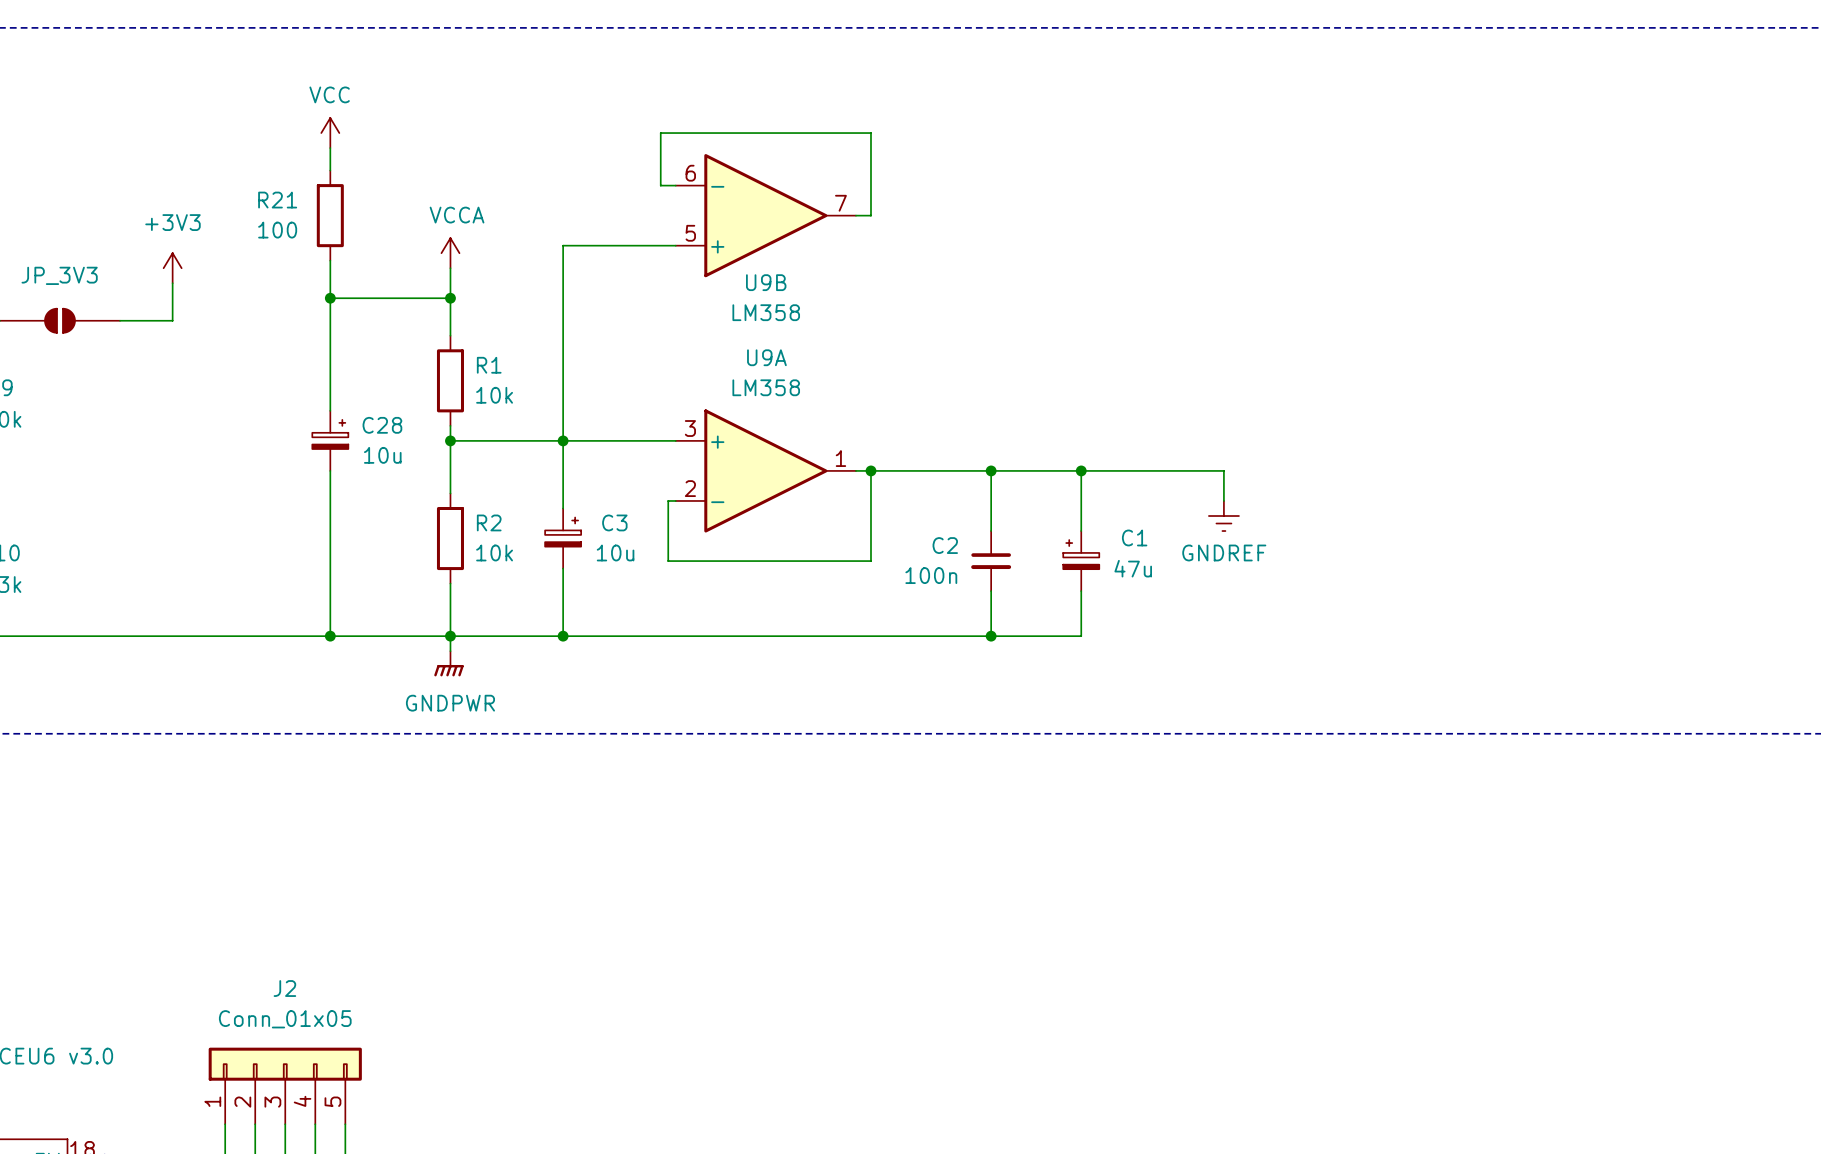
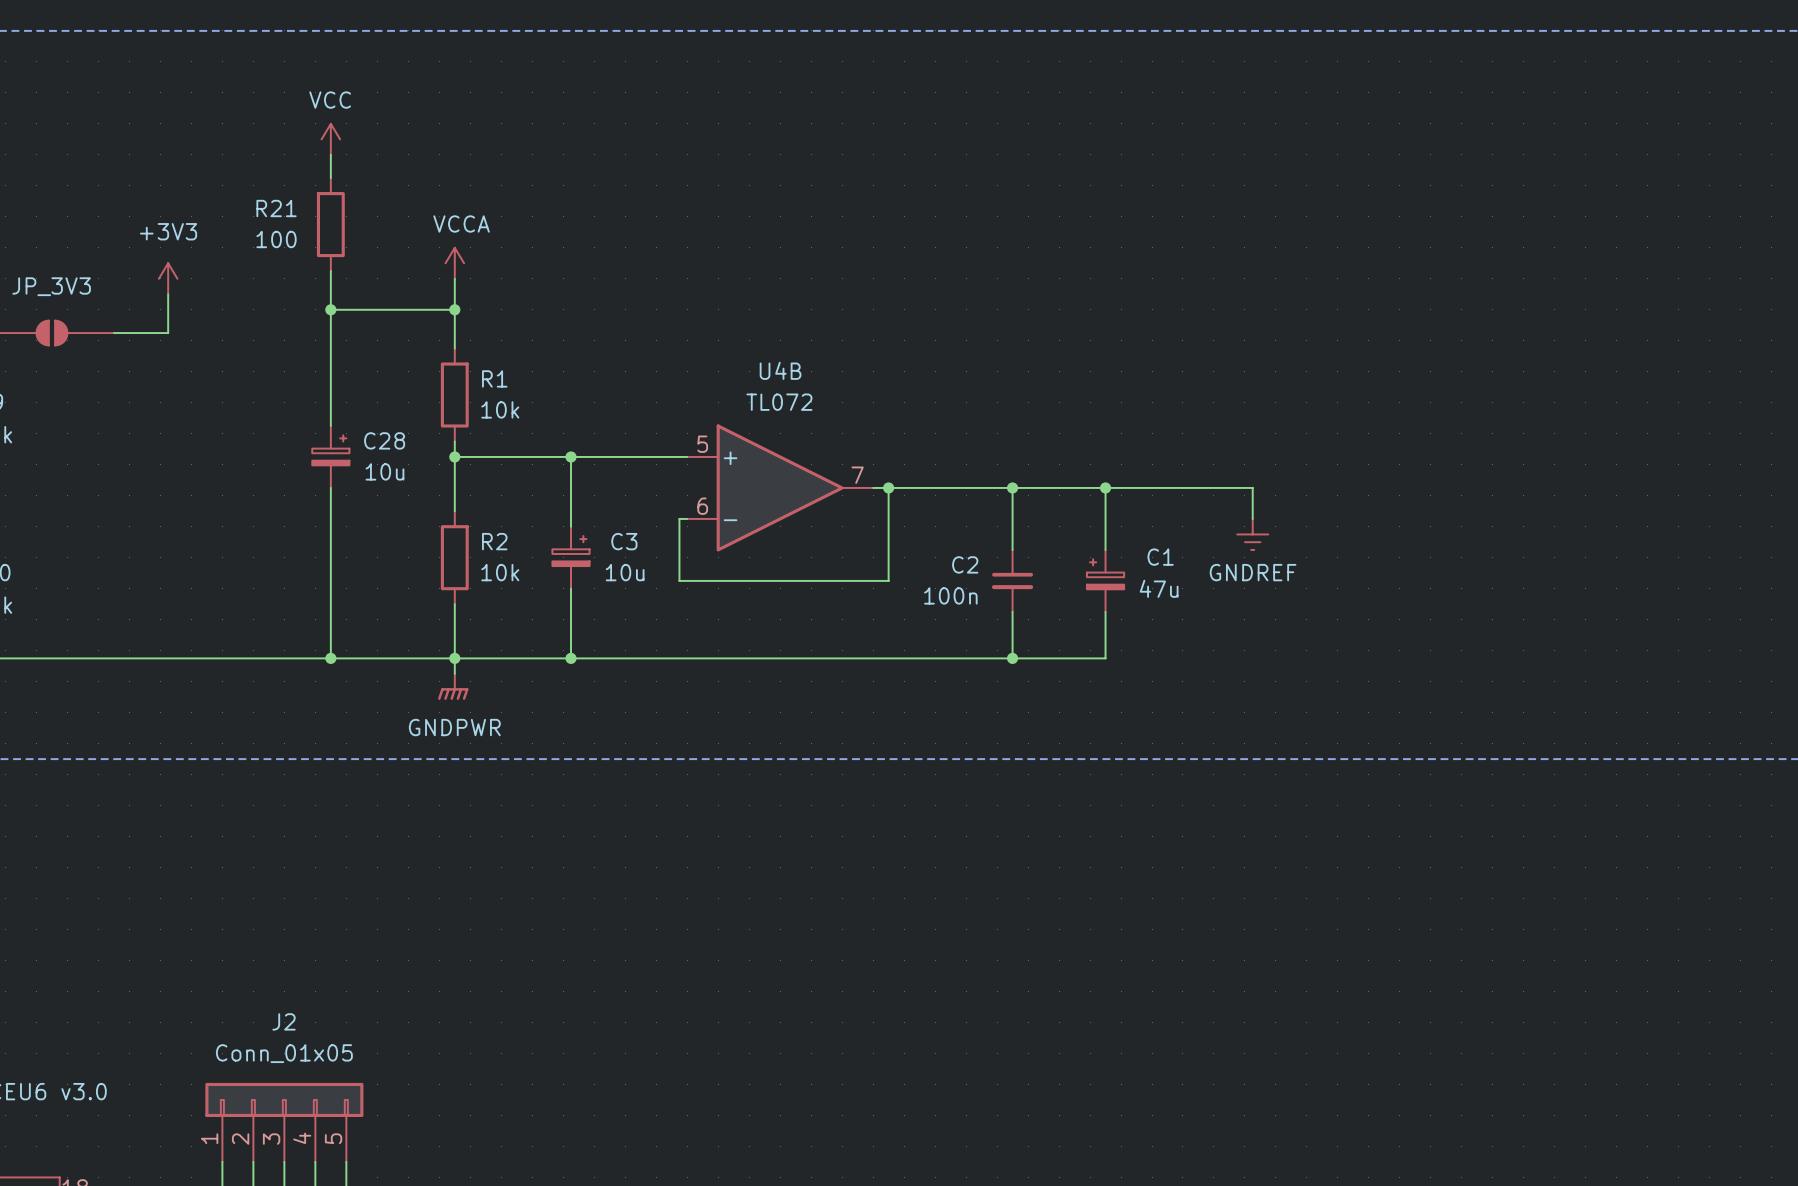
wire: (675, 185) (660, 185) (660, 133) (870, 133) (870, 215) (855, 215) -> none
U9B: LM358 (765, 215) -> none
wire: (675, 245) (563, 245) (563, 440) -> none
U9A name: U9A (766, 357) -> U4B (780, 370)
U9A value: LM358 (766, 387) -> TL072 (779, 402)
U9A pin number: 3 (690, 428) -> 5 (702, 444)
U9A pin number: 1 (840, 458) -> 7 (857, 475)
U9A pin number: 2 (690, 488) -> 6 (702, 506)

